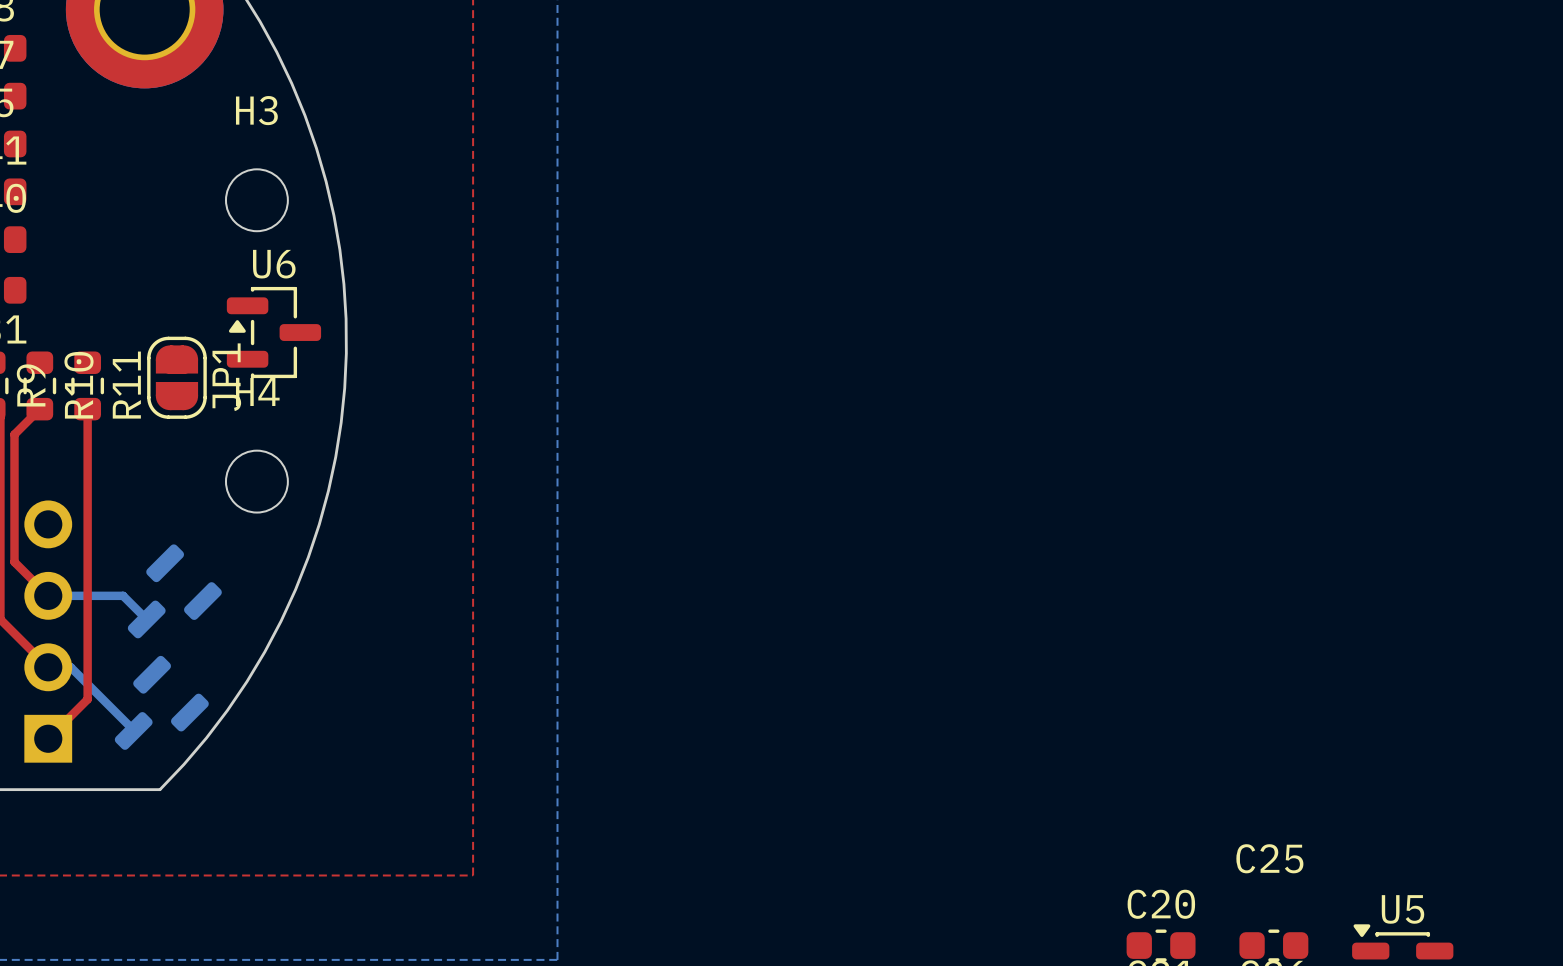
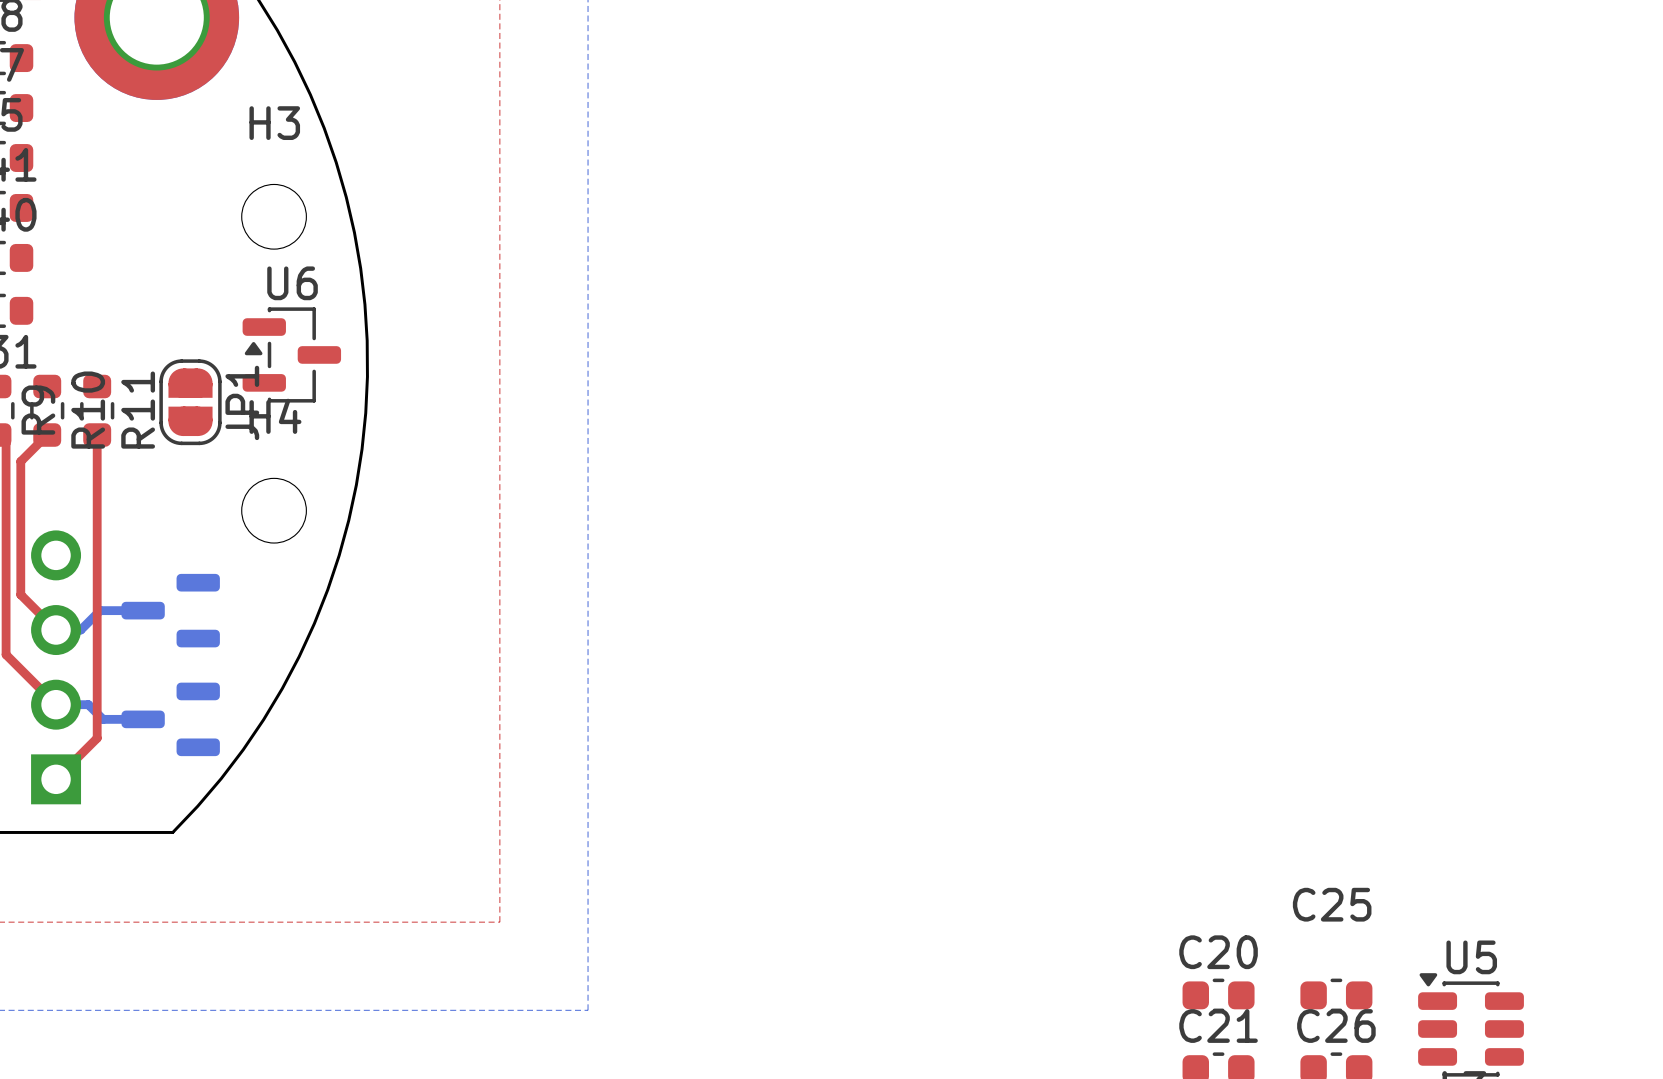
part rotation: 0° (174, 591) -> 45° clockwise (170, 610)
bottom track: (71, 595) (123, 595) (146, 619) -> (80, 630) (100, 610) (143, 610)
bottom track: (70, 667) (133, 730) -> (79, 704) (88, 704) (103, 719) (143, 719)
part rotation: 0° (161, 702) -> 45° clockwise (170, 719)

